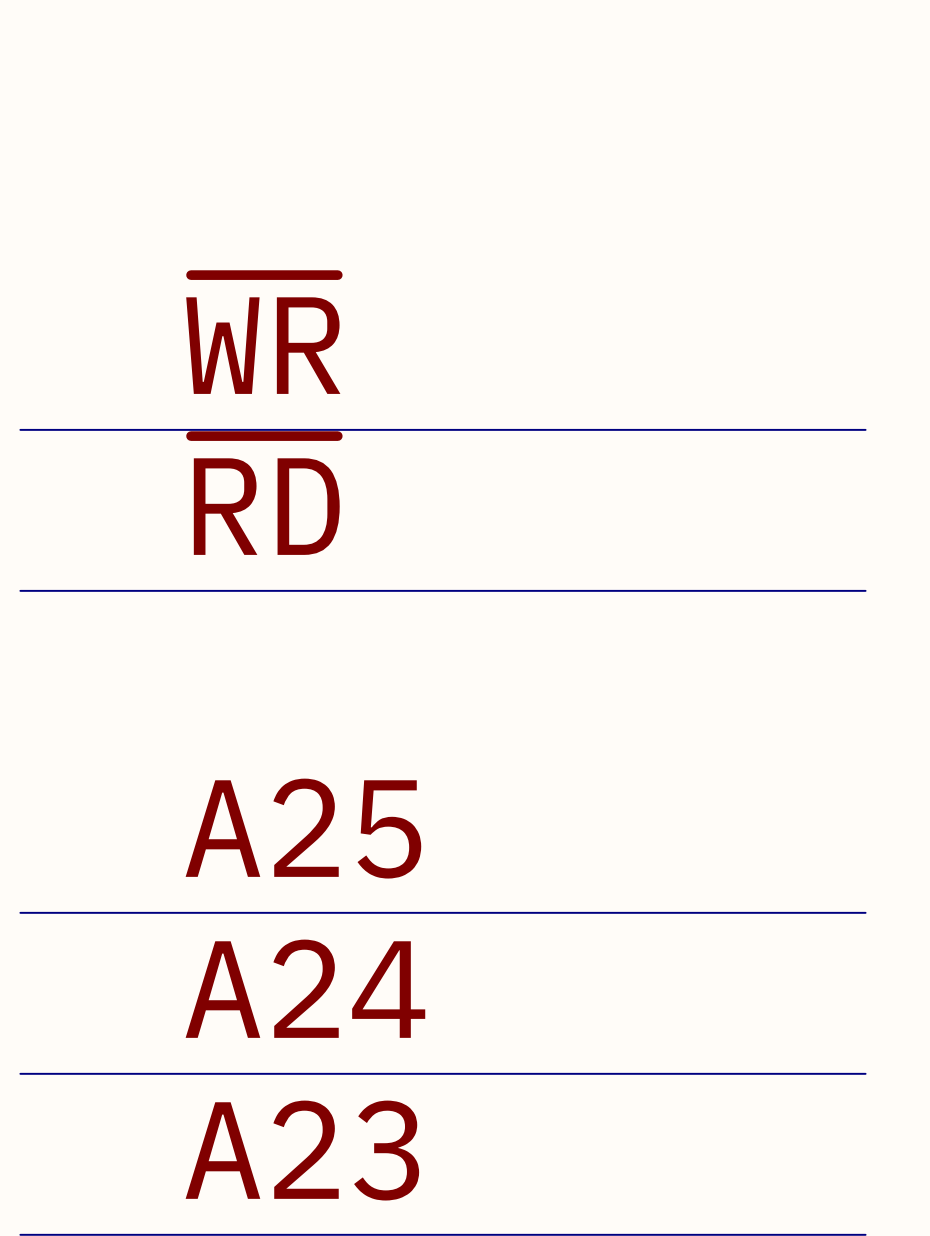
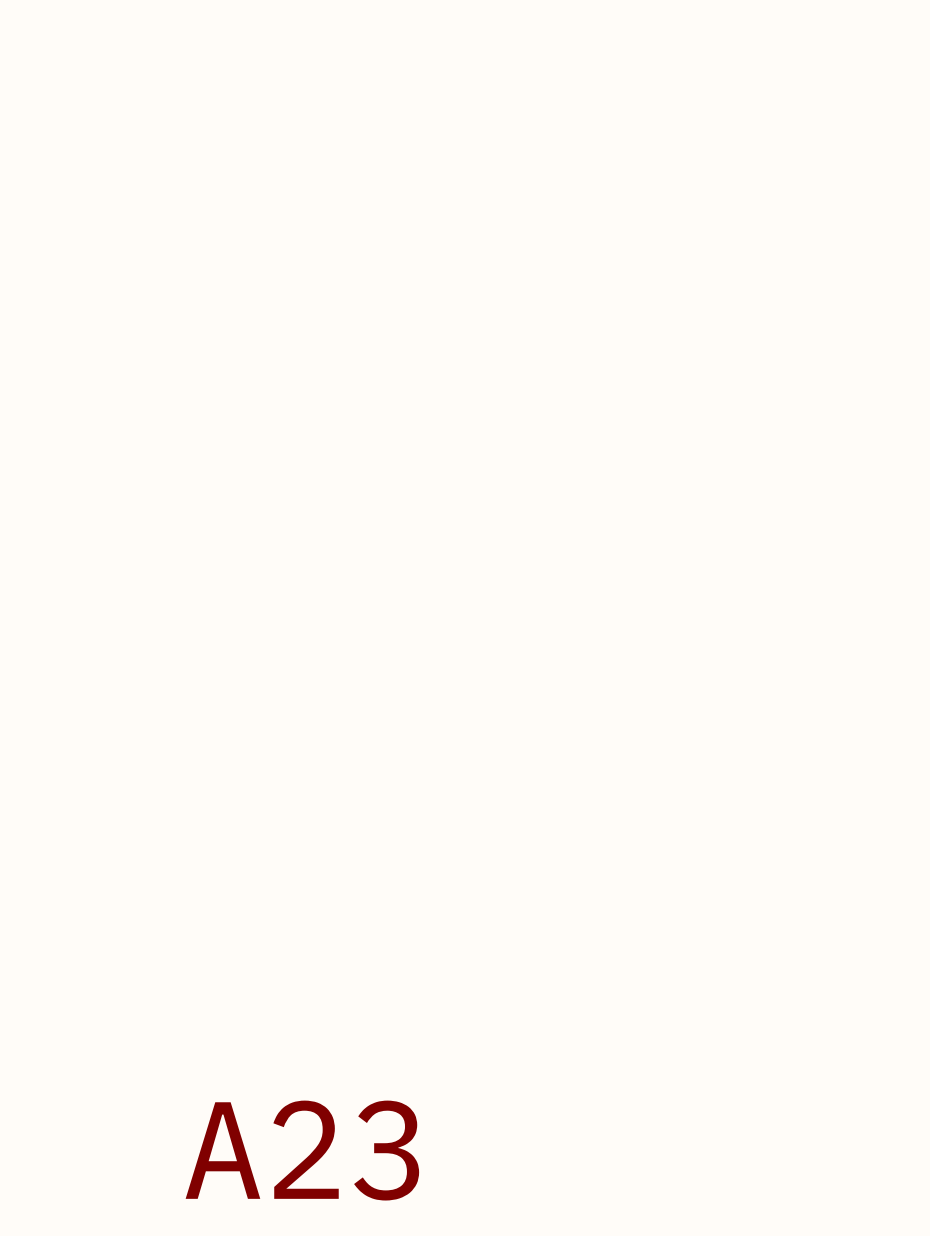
label: ~{WR} (263, 334) -> none
wire: (20, 429) (865, 429) -> none
label: ~{RD} (265, 495) -> none
wire: (20, 590) (865, 590) -> none
label: A25 (303, 828) -> none
wire: (20, 912) (865, 912) -> none
label: A24 (305, 988) -> none
wire: (20, 1073) (865, 1073) -> none
wire: (20, 1234) (865, 1234) -> none

